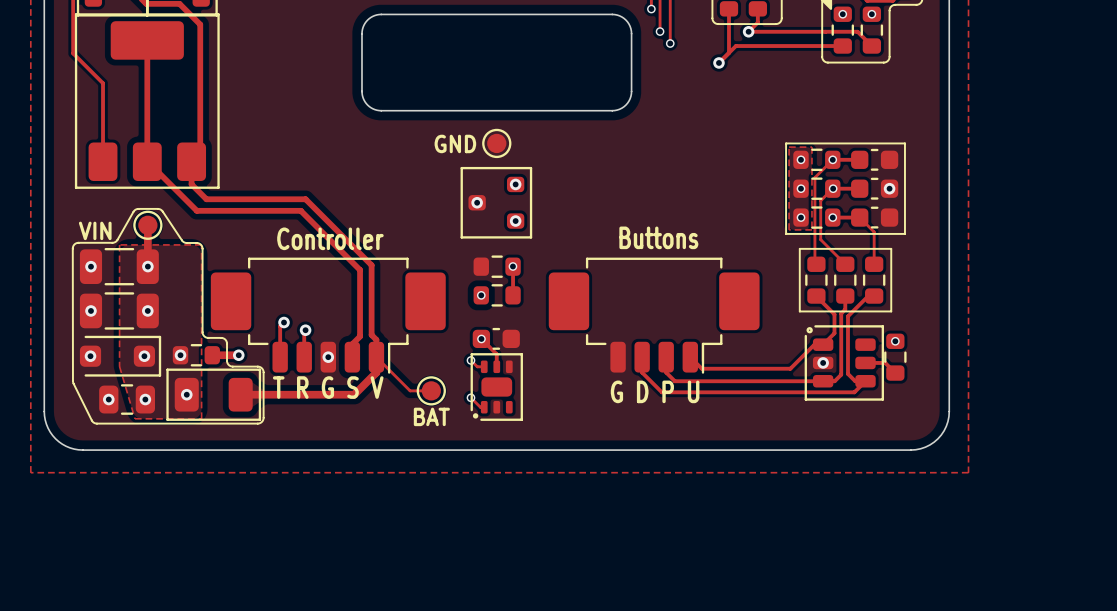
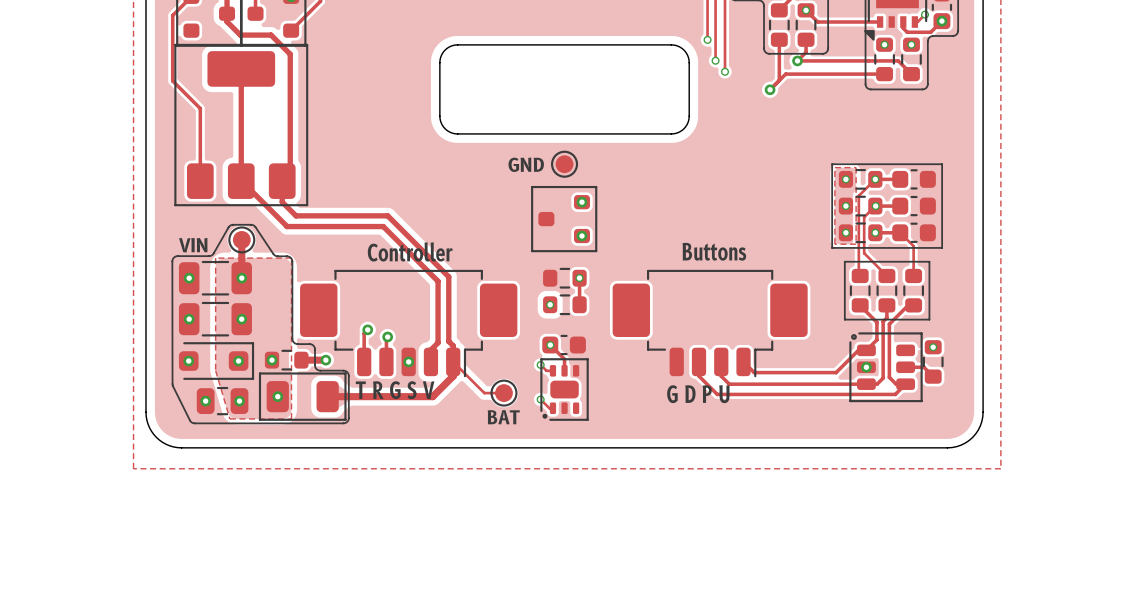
via: (889, 188) -> none
via: (477, 202) -> none

